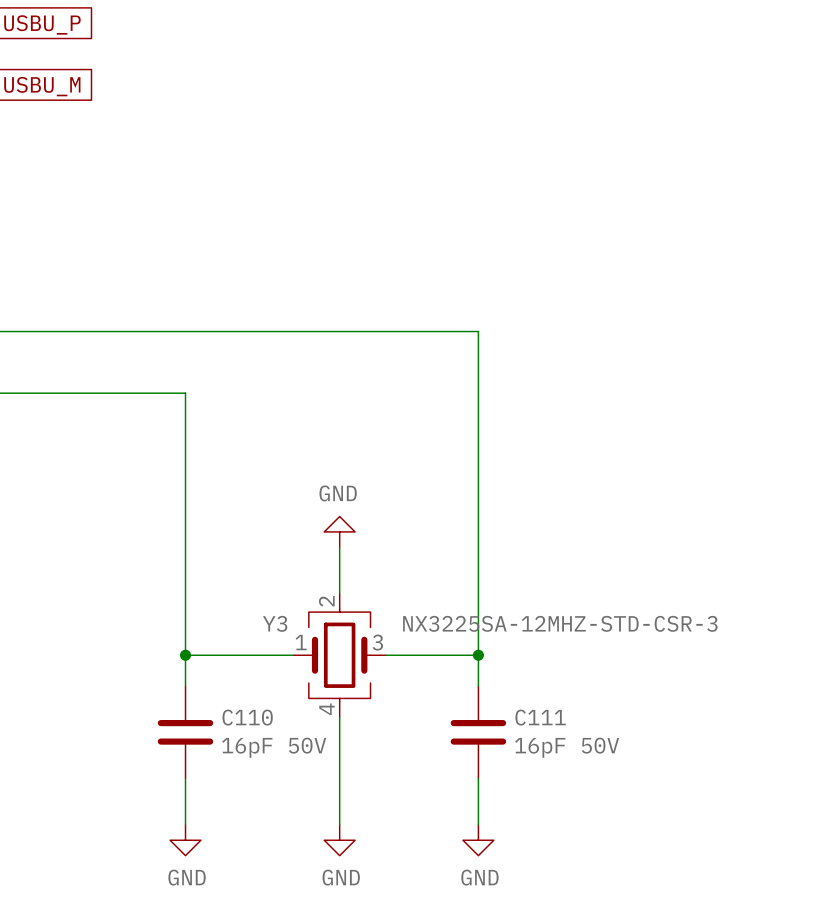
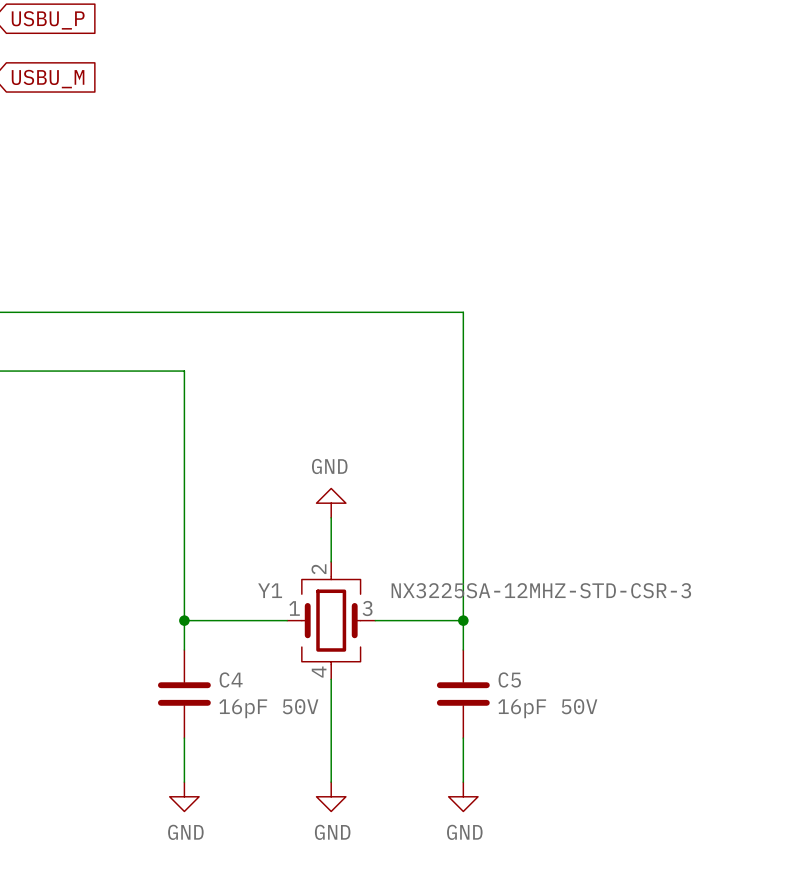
Y3 name: Y3 (275, 623) -> Y1 (270, 590)
C110 name: C110 (247, 717) -> C4 (231, 679)
C111 name: C111 (540, 717) -> C5 (509, 679)

